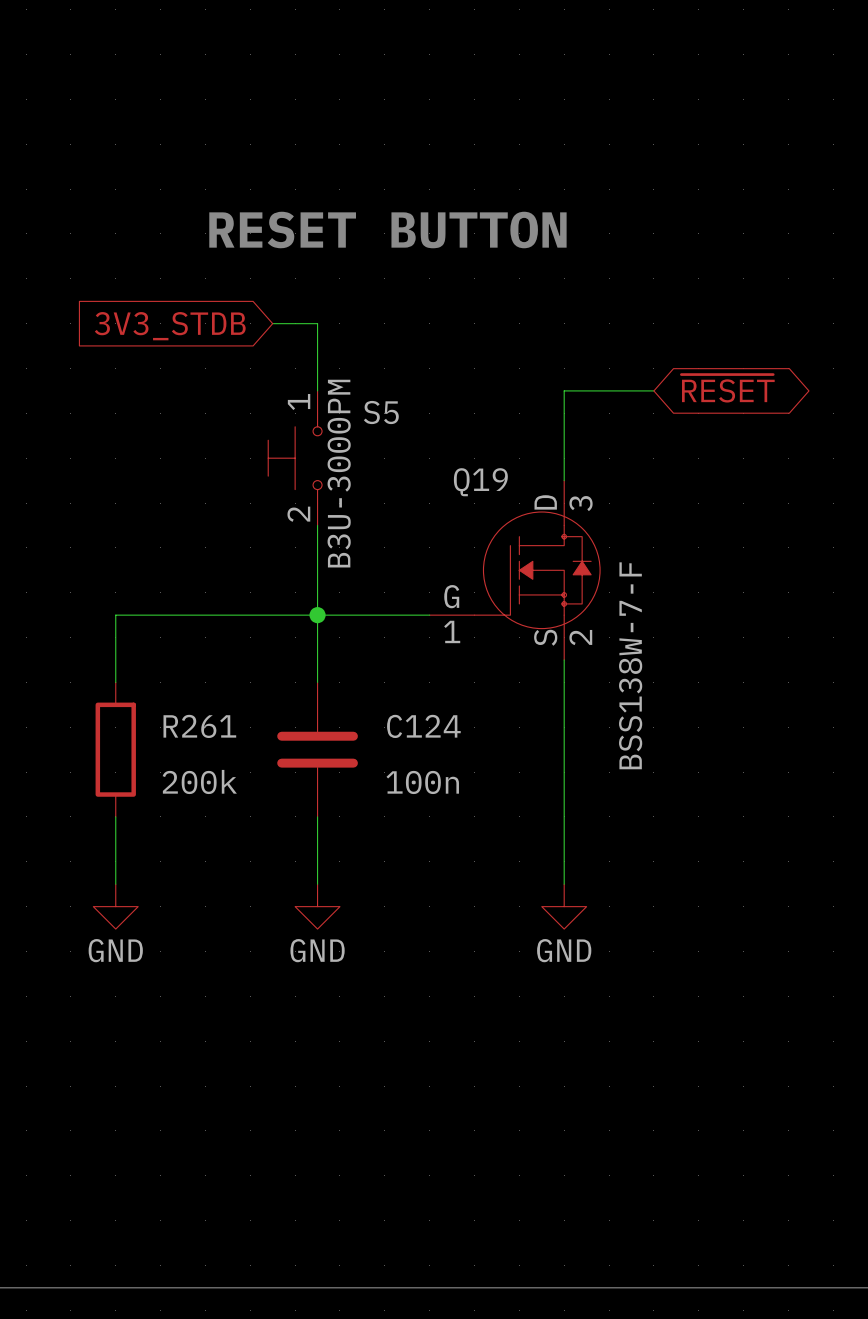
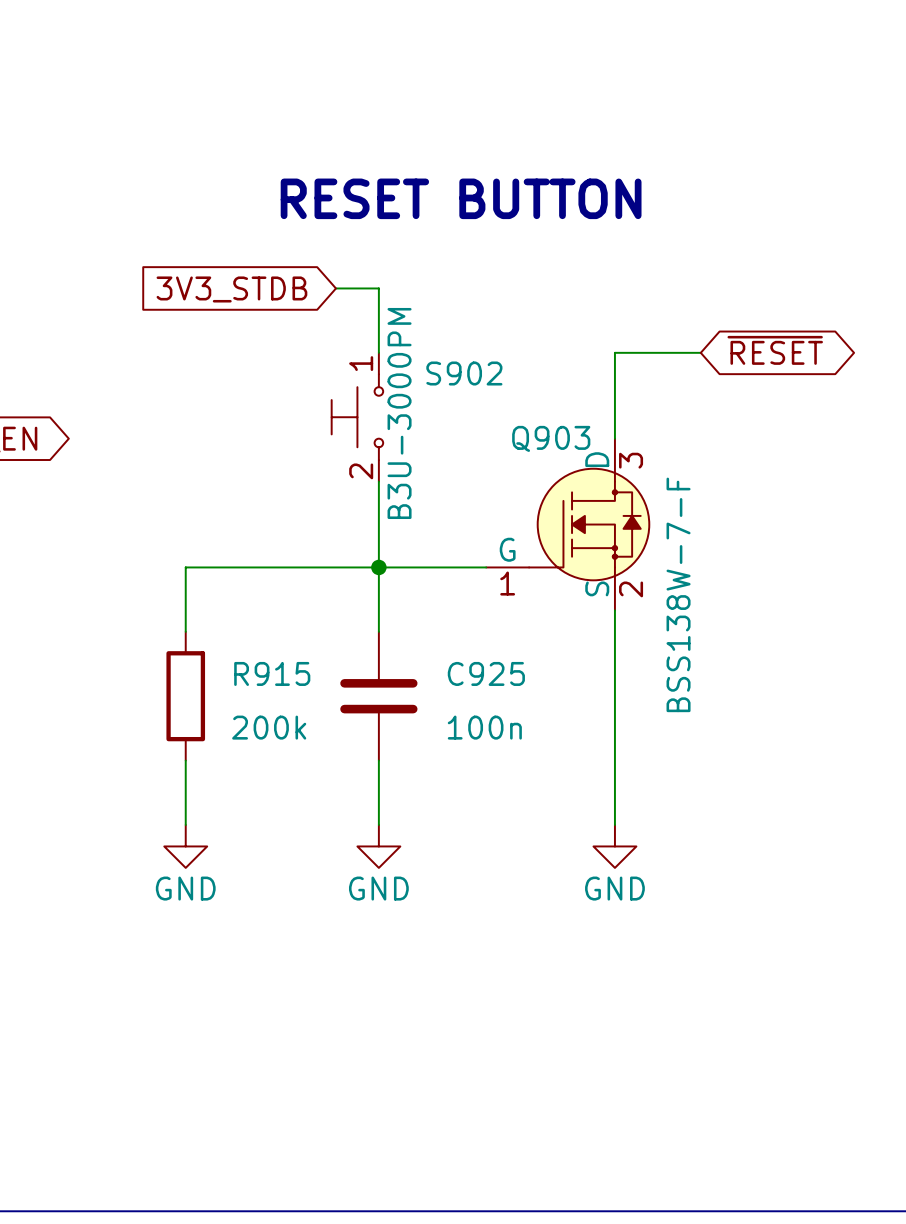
S5 name: S5 (381, 412) -> S902 (464, 373)
Q19 name: Q19 (480, 482) -> Q903 (551, 438)
R261 name: R261 (199, 726) -> R915 (272, 673)
C124 name: C124 (423, 726) -> C925 (486, 673)

